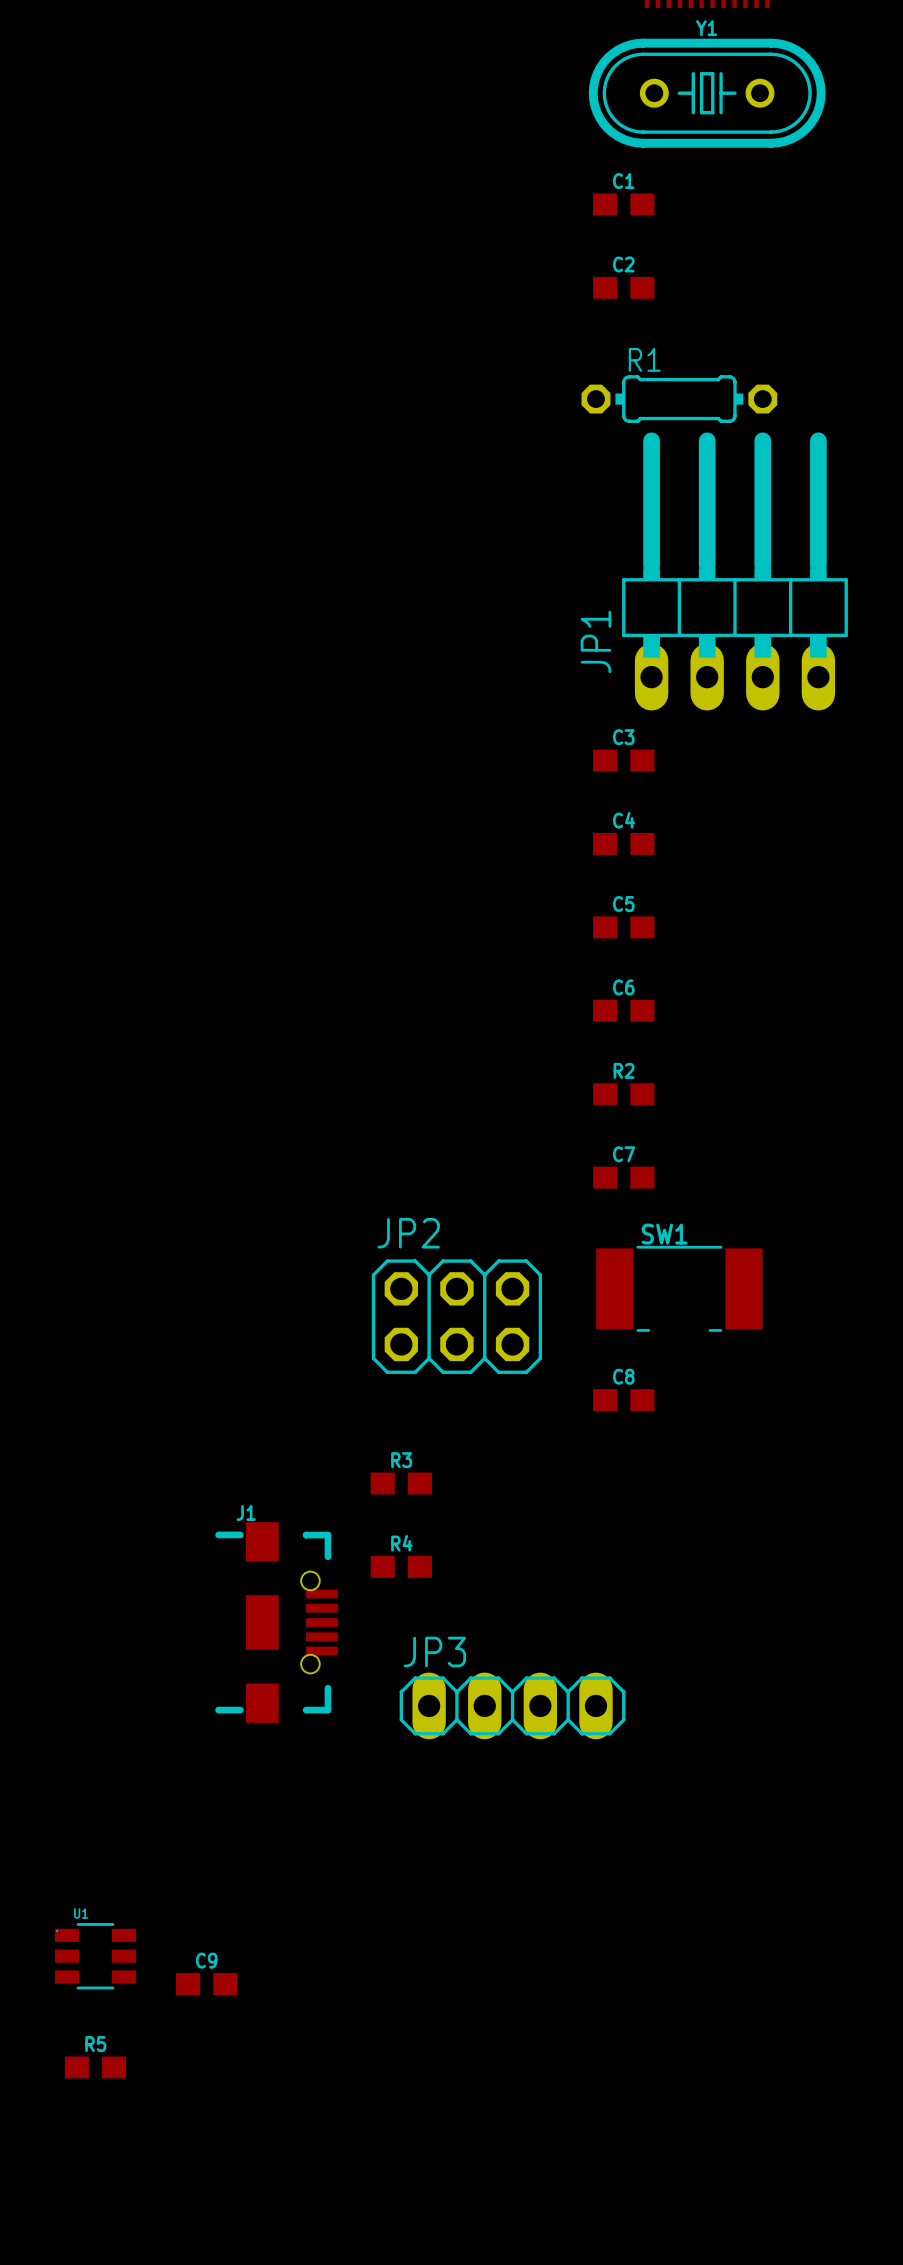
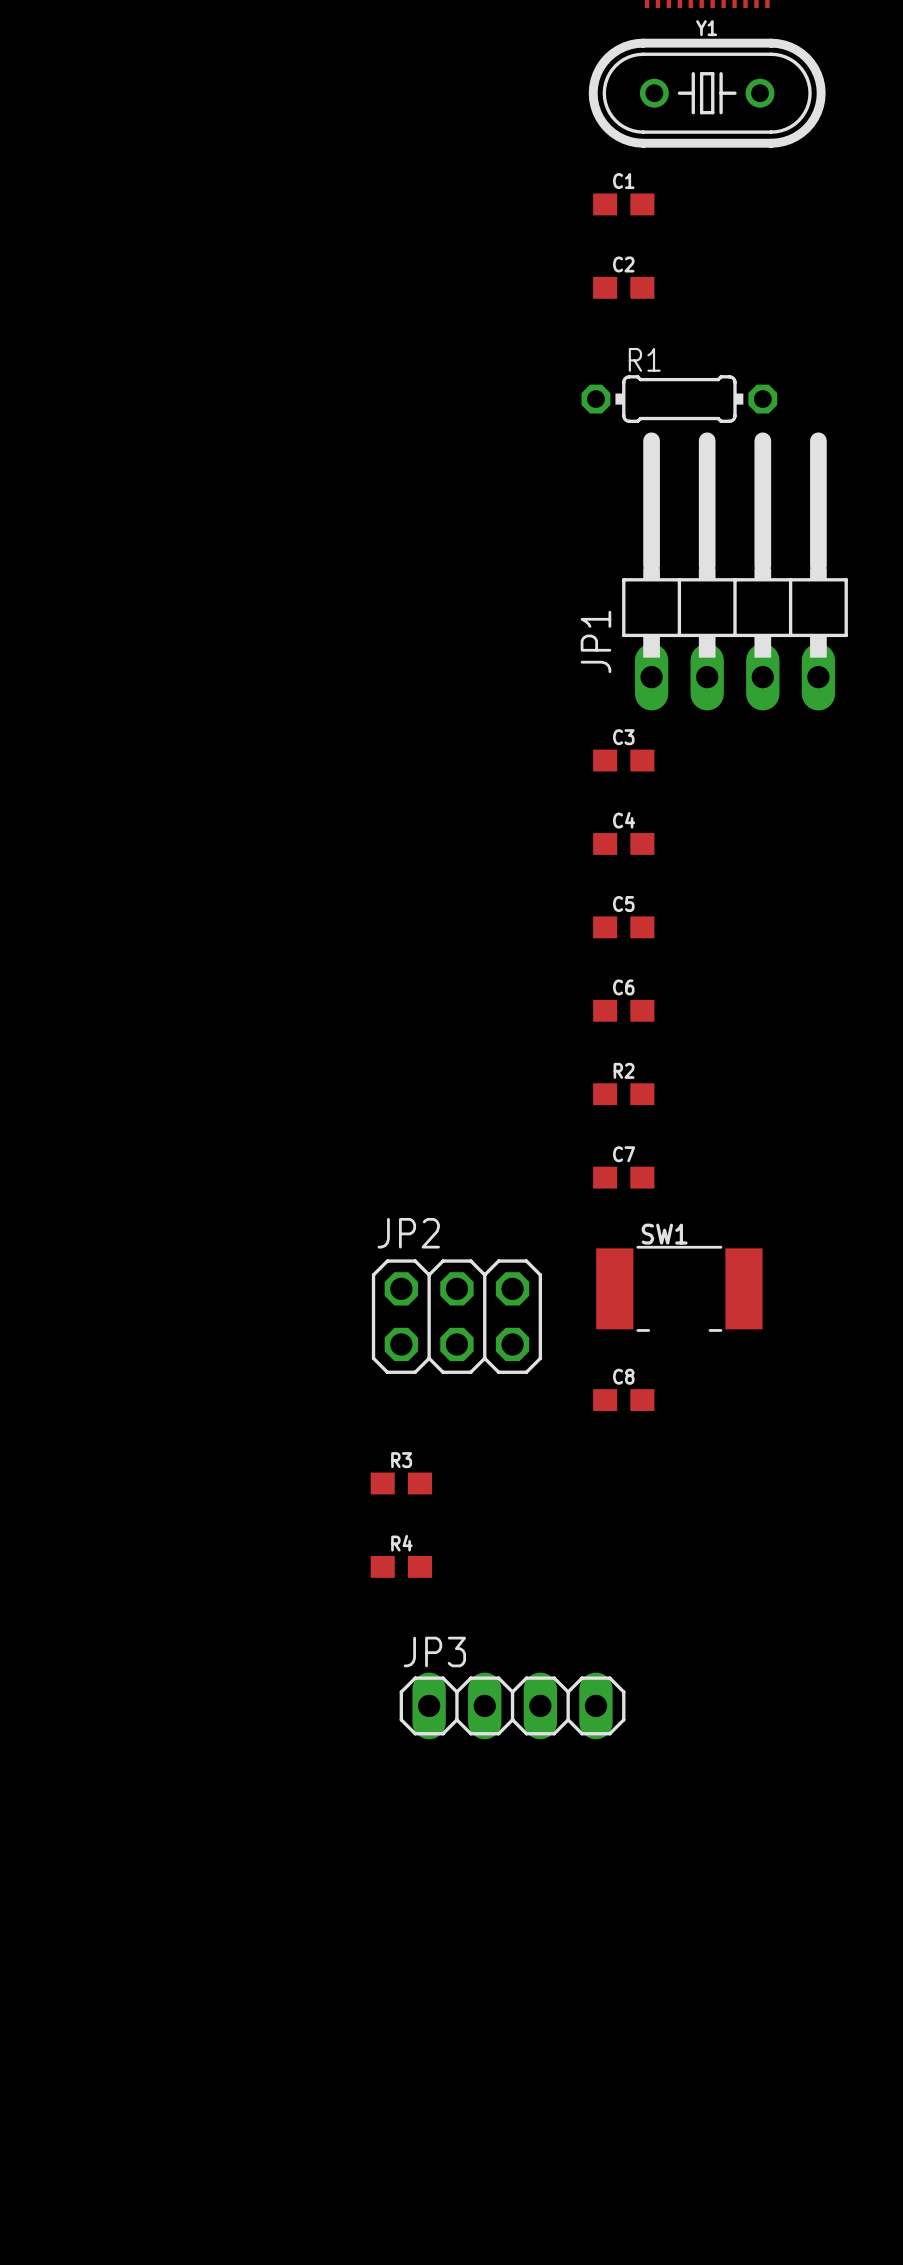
J1: (276, 1622) -> none
U1: (95, 1956) -> none
C9: (206, 1983) -> none
R5: (95, 2067) -> none

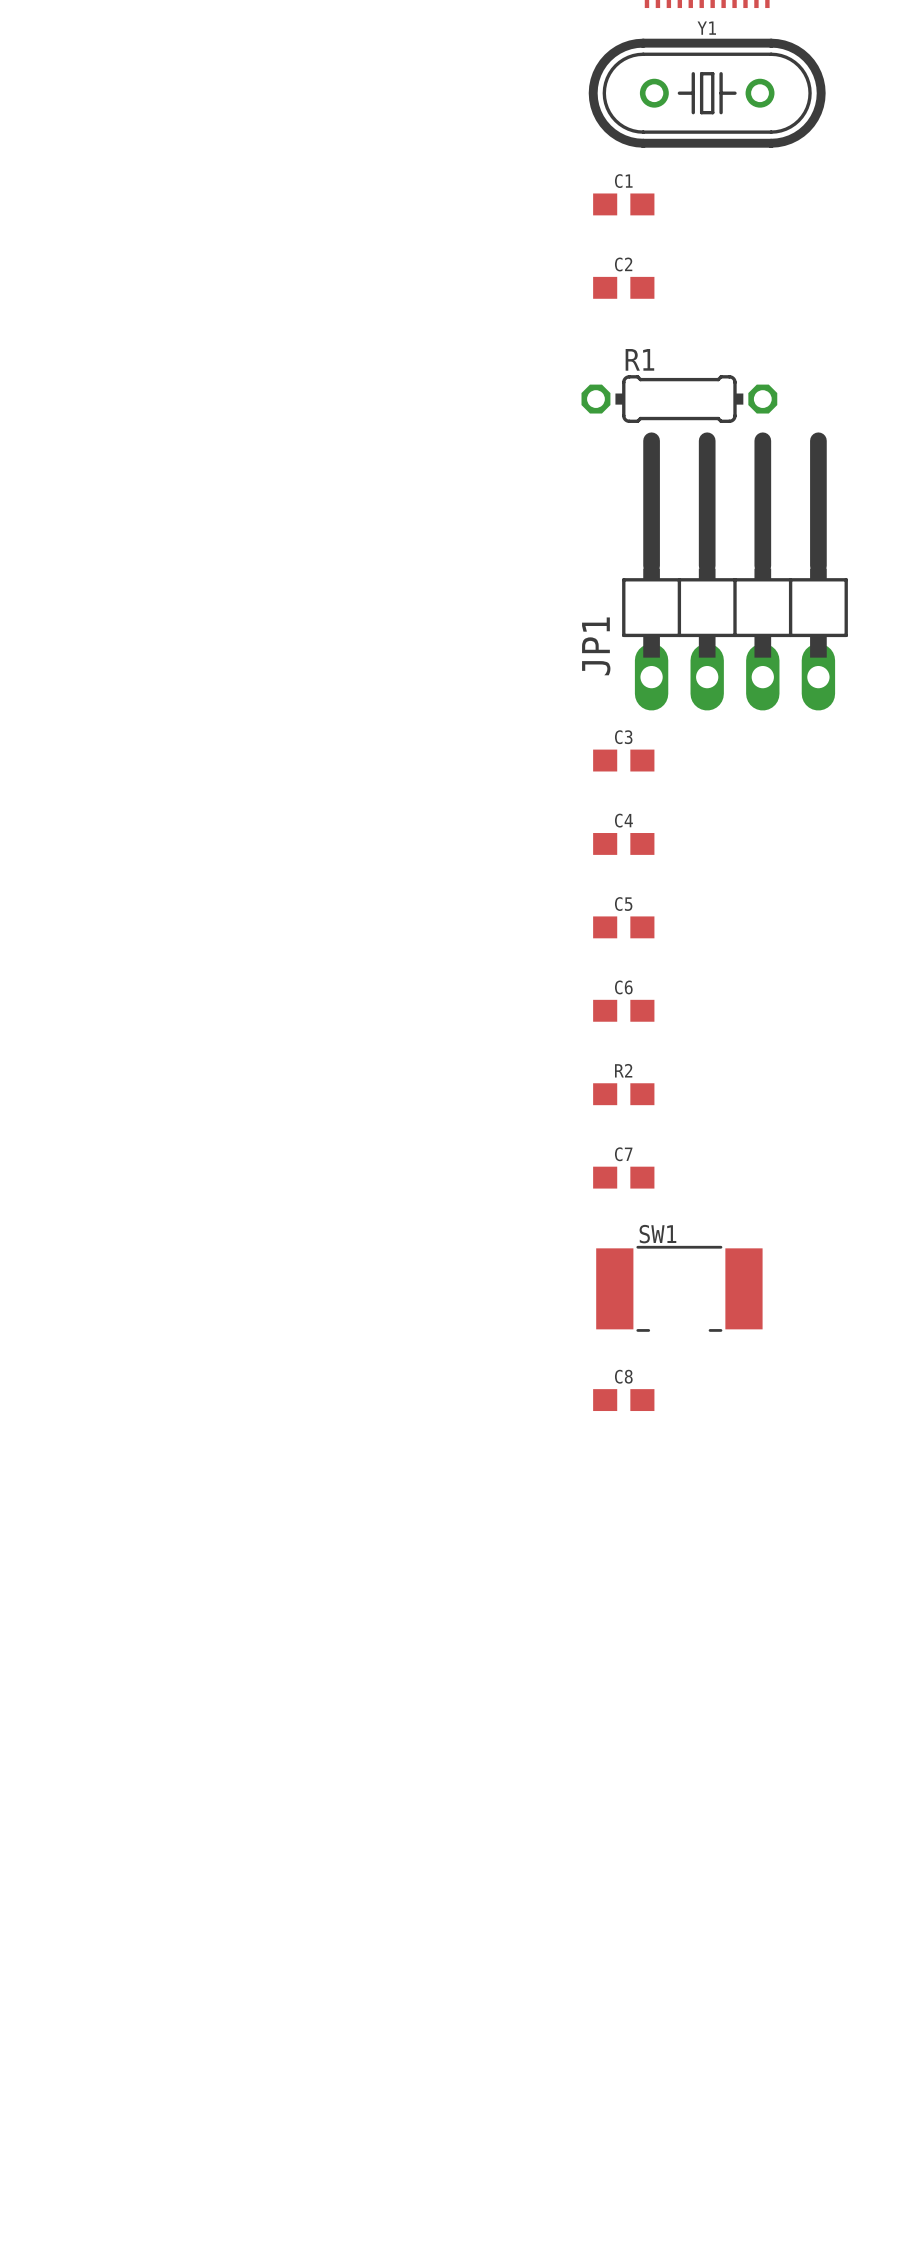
JP2: (456, 1316) -> none
R3: (401, 1483) -> none
R4: (401, 1566) -> none
JP3: (512, 1705) -> none

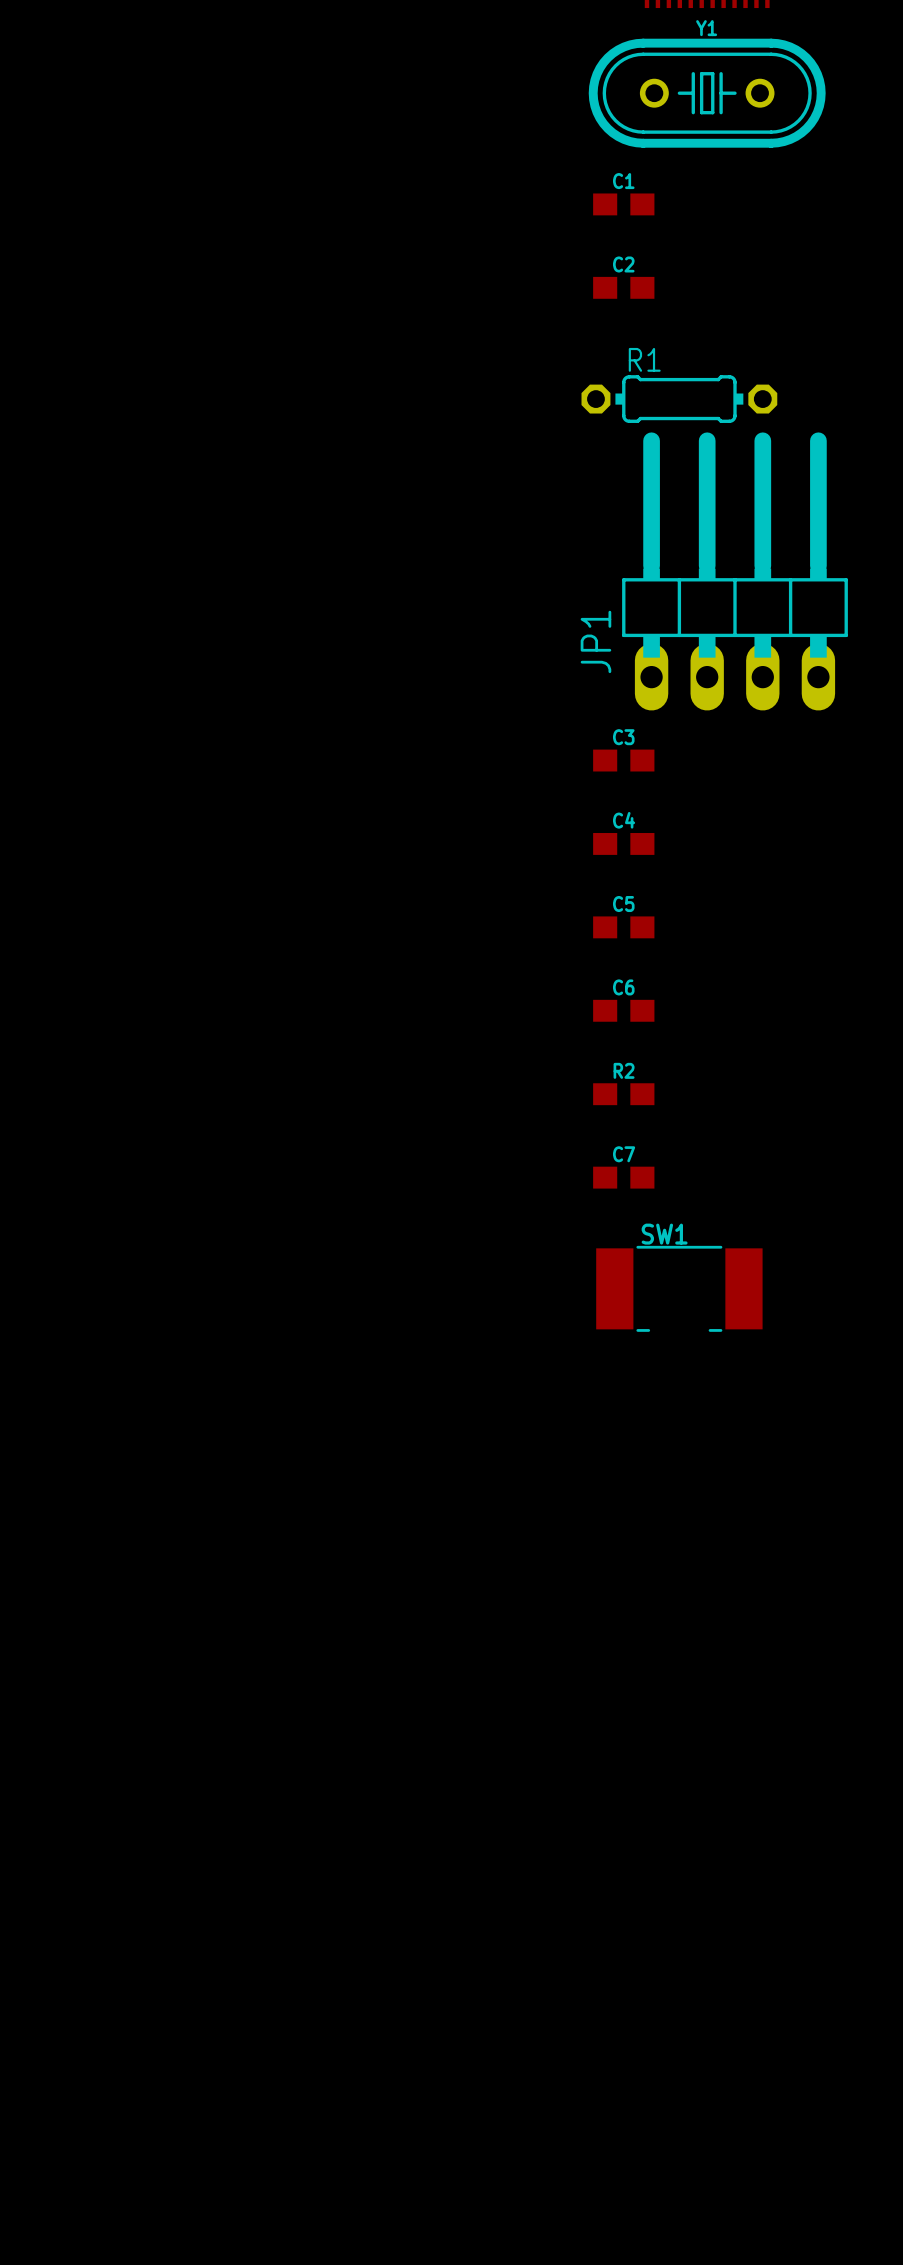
C8: (623, 1400) -> none

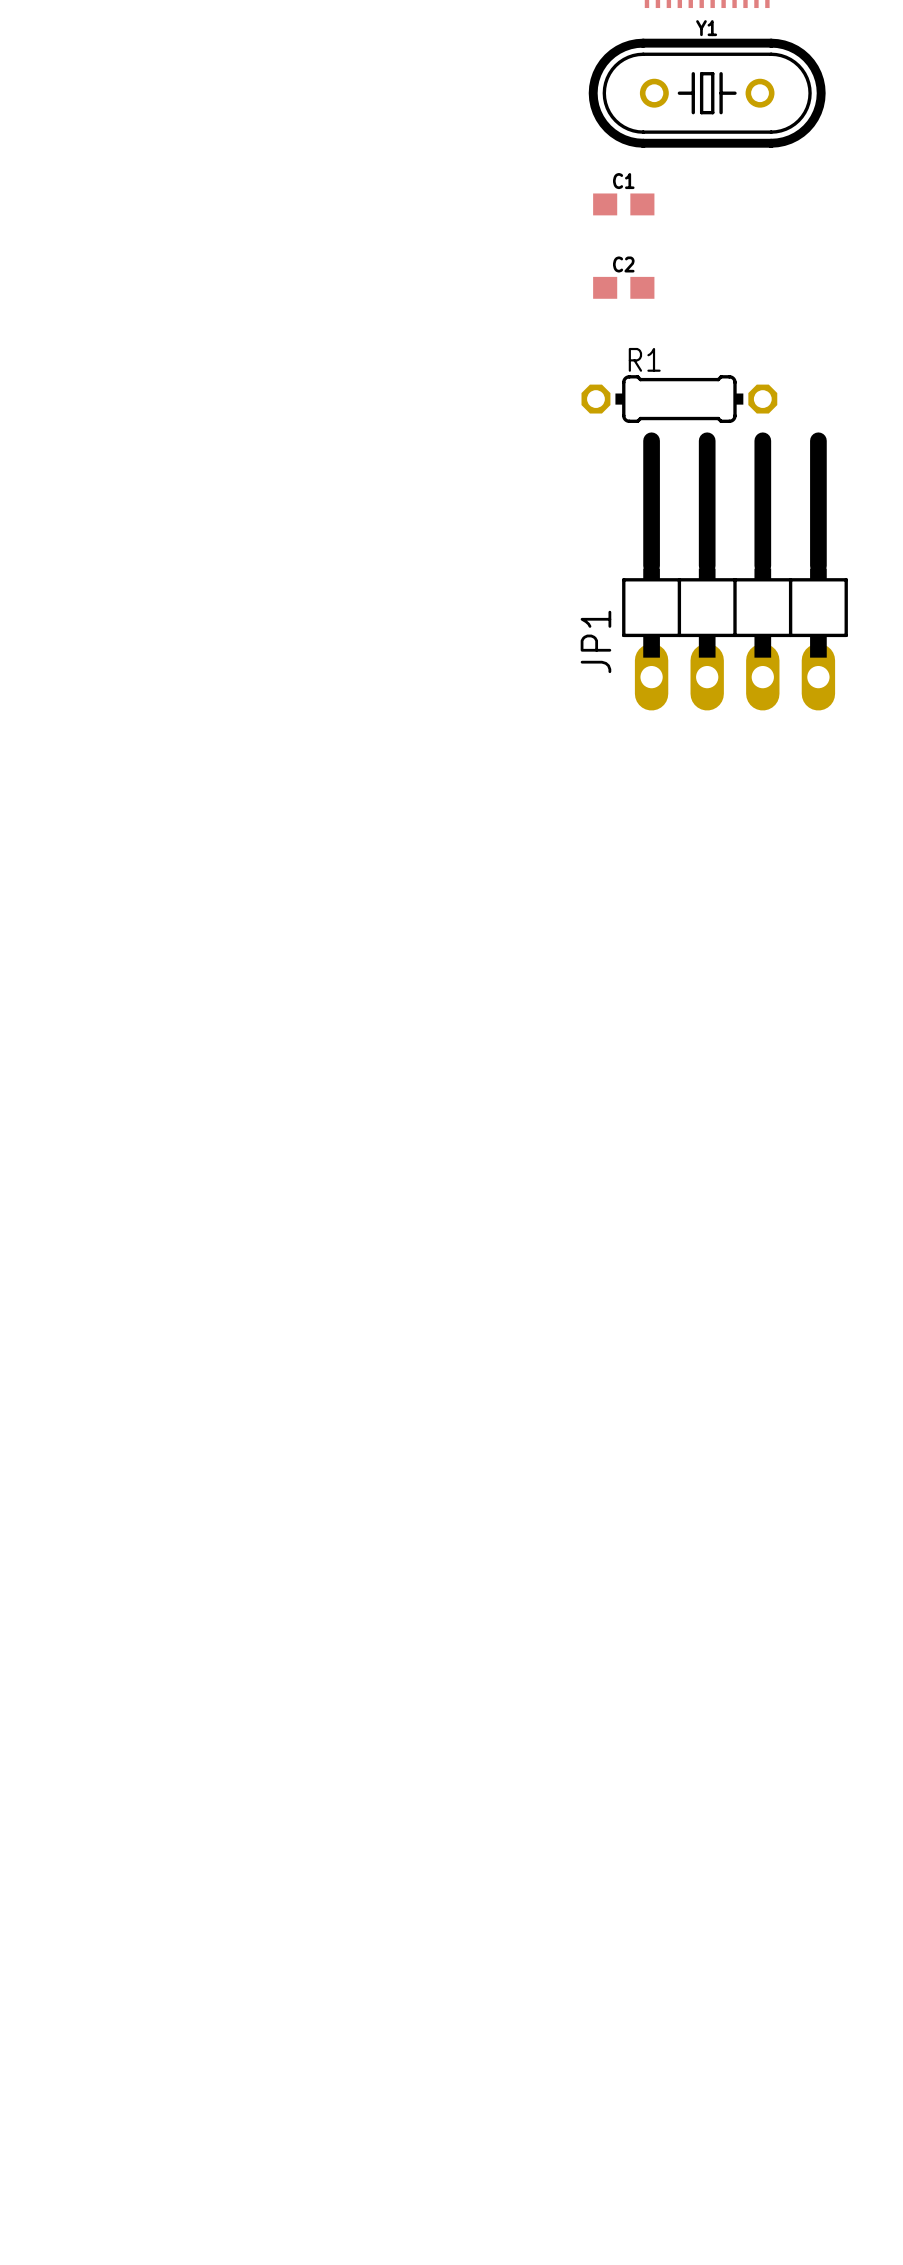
C3: (623, 760) -> none
C4: (623, 843) -> none
C5: (623, 927) -> none
C6: (623, 1010) -> none
R2: (623, 1094) -> none
C7: (623, 1177) -> none
SW1: (679, 1288) -> none

